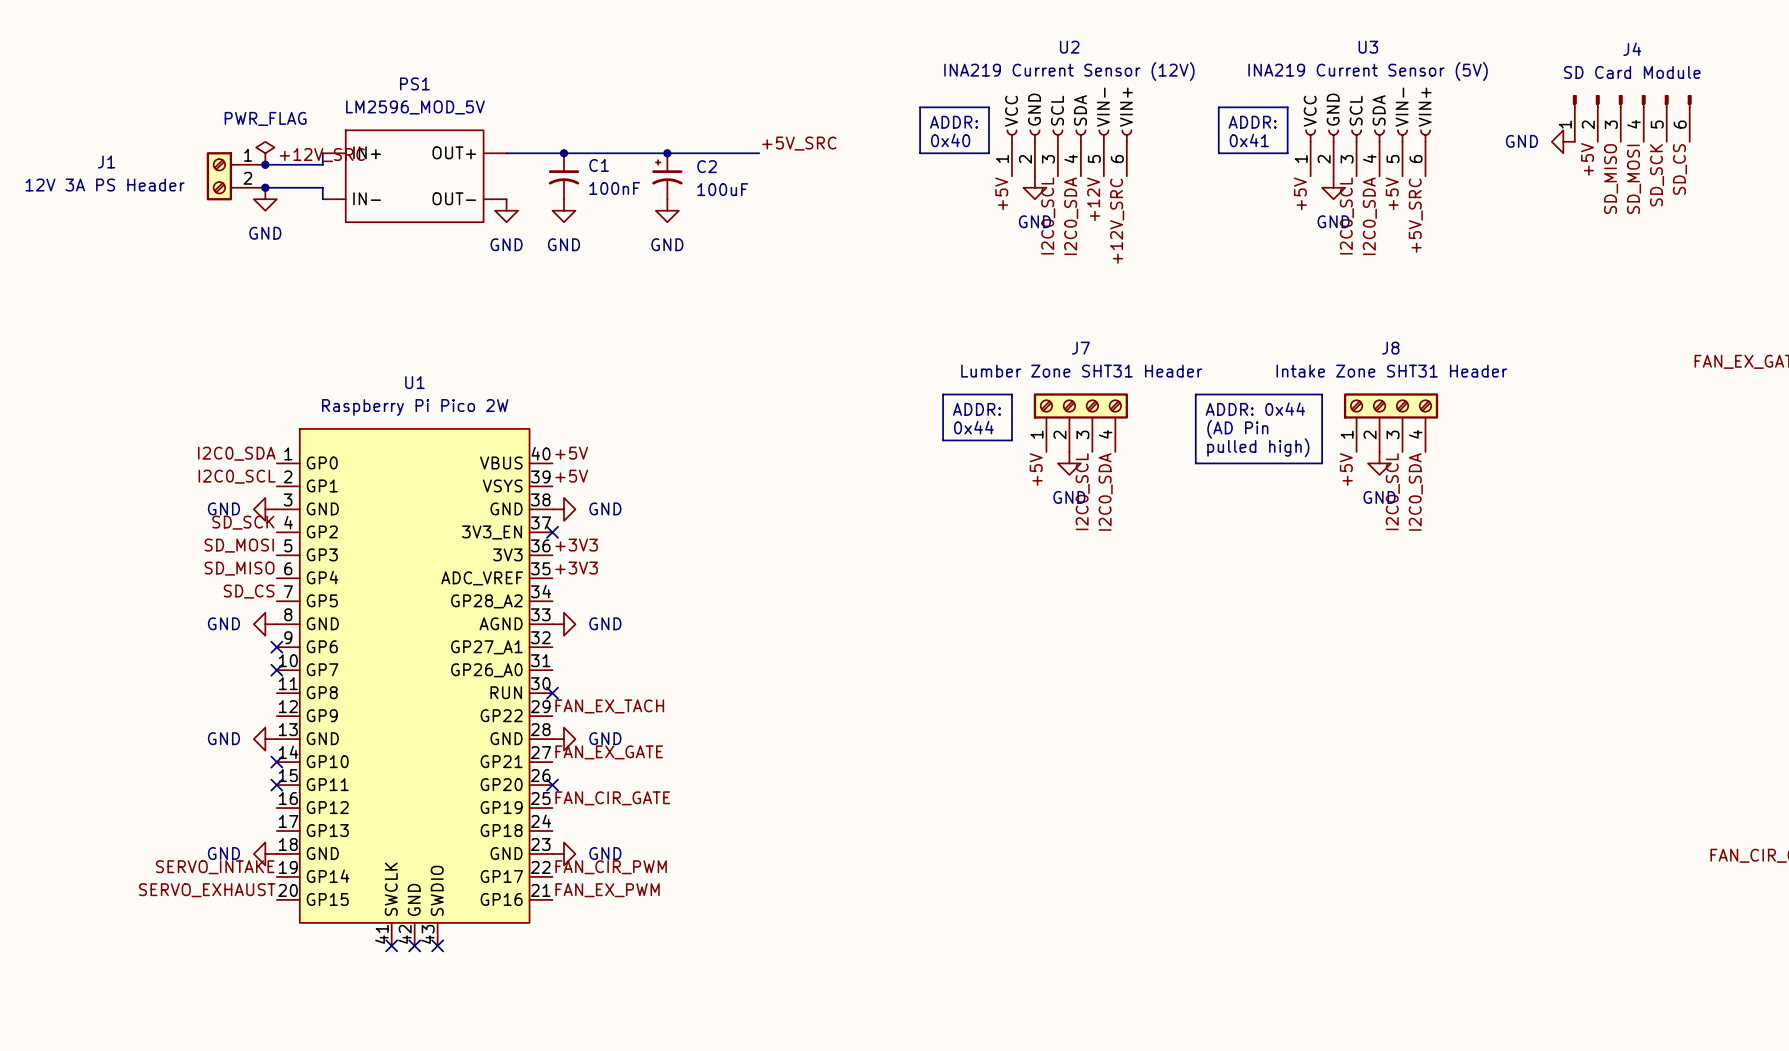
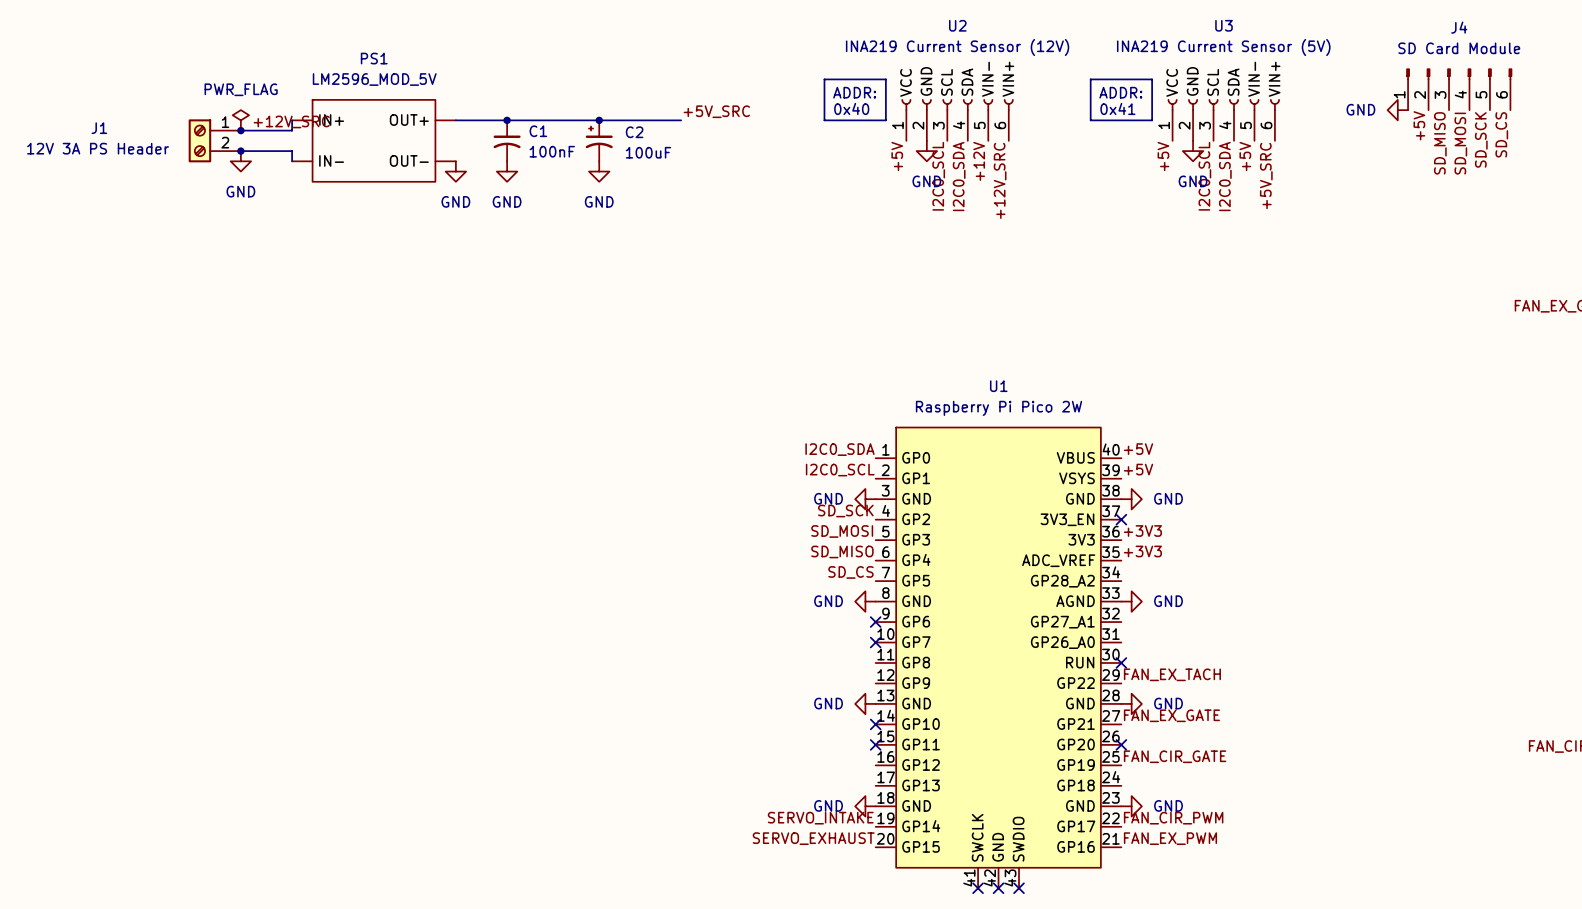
line: (943, 394) (1011, 394) (1011, 440) (943, 440) (943, 394) -> none
line: (1195, 394) (1322, 394) (1322, 463) (1195, 463) (1195, 394) -> none
text: ADDR: (976, 409) -> none
text: ADDR: 0x44 (1255, 409) -> none
J7: Lumber Zone SHT31 Header (1080, 422) -> none
J8: Intake Zone SHT31 Header (1391, 422) -> none
text: 0x44 (973, 427) -> none
text: (AD Pin (1237, 429) -> none
text: pulled high) (1258, 447) -> none
label: I2C0_SDA (236, 453) -> none
label: +5V (571, 453) -> none
power symbol: GND (1069, 463) -> none
power symbol: GND (1379, 463) -> none
label: +5V (1036, 469) -> none
label: +5V (1346, 469) -> none
label: I2C0_SCL (237, 476) -> none
label: +5V (571, 476) -> none
label rotation: 0° (1082, 491) -> 90° clockwise (840, 470)
label position: I2C0_SCL (1082, 491) -> I2C0_SCL (840, 470)
label rotation: 0° (1105, 491) -> 90° clockwise (840, 449)
label position: I2C0_SDA (1105, 491) -> I2C0_SDA (840, 449)
label: I2C0_SCL (1392, 491) -> none
label: I2C0_SDA (1415, 491) -> none
power symbol: GND (265, 509) -> none
power symbol: GND (563, 509) -> none
label: SD_SCK (243, 522) -> none
label: none -> +5V (1138, 449)
no-connect mark: (552, 532) -> none
label: SD_MOSI (239, 545) -> none
label: +3V3 (576, 545) -> none
label: none -> +5V (1138, 469)
label: SD_MISO (239, 568) -> none
label: +3V3 (576, 568) -> none
power symbol: none -> GND (865, 499)
power symbol: none -> GND (1131, 499)
label: SD_CS (249, 591) -> none
label: none -> SD_SCK (845, 511)
no-connect mark: none -> (1121, 519)
label: none -> +3V3 (1142, 531)
label: none -> SD_MOSI (842, 531)
power symbol: GND (265, 624) -> none
power symbol: GND (563, 624) -> none
label: none -> +3V3 (1142, 551)
label: none -> SD_MISO (842, 551)
no-connect mark: (276, 647) -> none
label: none -> SD_CS (850, 572)
no-connect mark: (276, 670) -> none
U1 position: (414, 687) -> (998, 657)
no-connect mark: (552, 693) -> none
power symbol: none -> GND (865, 601)
power symbol: none -> GND (1131, 601)
label: FAN_EX_TACH (609, 706) -> none
no-connect mark: none -> (875, 622)
power symbol: GND (265, 739) -> none
power symbol: GND (563, 739) -> none
no-connect mark: none -> (875, 642)
label: FAN_EX_GATE (609, 752) -> none
no-connect mark: (276, 762) -> none
no-connect mark: none -> (1121, 663)
label: none -> FAN_EX_TACH (1172, 674)
no-connect mark: (276, 785) -> none
no-connect mark: (552, 785) -> none
label: FAN_CIR_GATE (612, 798) -> none
power symbol: none -> GND (865, 703)
power symbol: none -> GND (1131, 703)
label: none -> FAN_EX_GATE (1171, 715)
no-connect mark: none -> (875, 724)
power symbol: GND (265, 853) -> none
power symbol: GND (563, 853) -> none
no-connect mark: none -> (875, 744)
no-connect mark: none -> (1121, 744)
label: SERVO_INTAKE (215, 867) -> none
label: FAN_CIR_PWM (611, 867) -> none
label: none -> FAN_CIR_GATE (1175, 756)
label: SERVO_EXHAUST (207, 890) -> none
label: FAN_EX_PWM (607, 890) -> none
power symbol: none -> GND (865, 806)
power symbol: none -> GND (1131, 806)
label: none -> SERVO_INTAKE (820, 818)
label: none -> FAN_CIR_PWM (1173, 818)
no-connect mark: (391, 945) -> none
no-connect mark: (414, 945) -> none
no-connect mark: (437, 945) -> none
label: none -> SERVO_EXHAUST (813, 838)
label: none -> FAN_EX_PWM (1170, 838)
no-connect mark: none -> (978, 888)
no-connect mark: none -> (998, 888)
no-connect mark: none -> (1019, 888)

